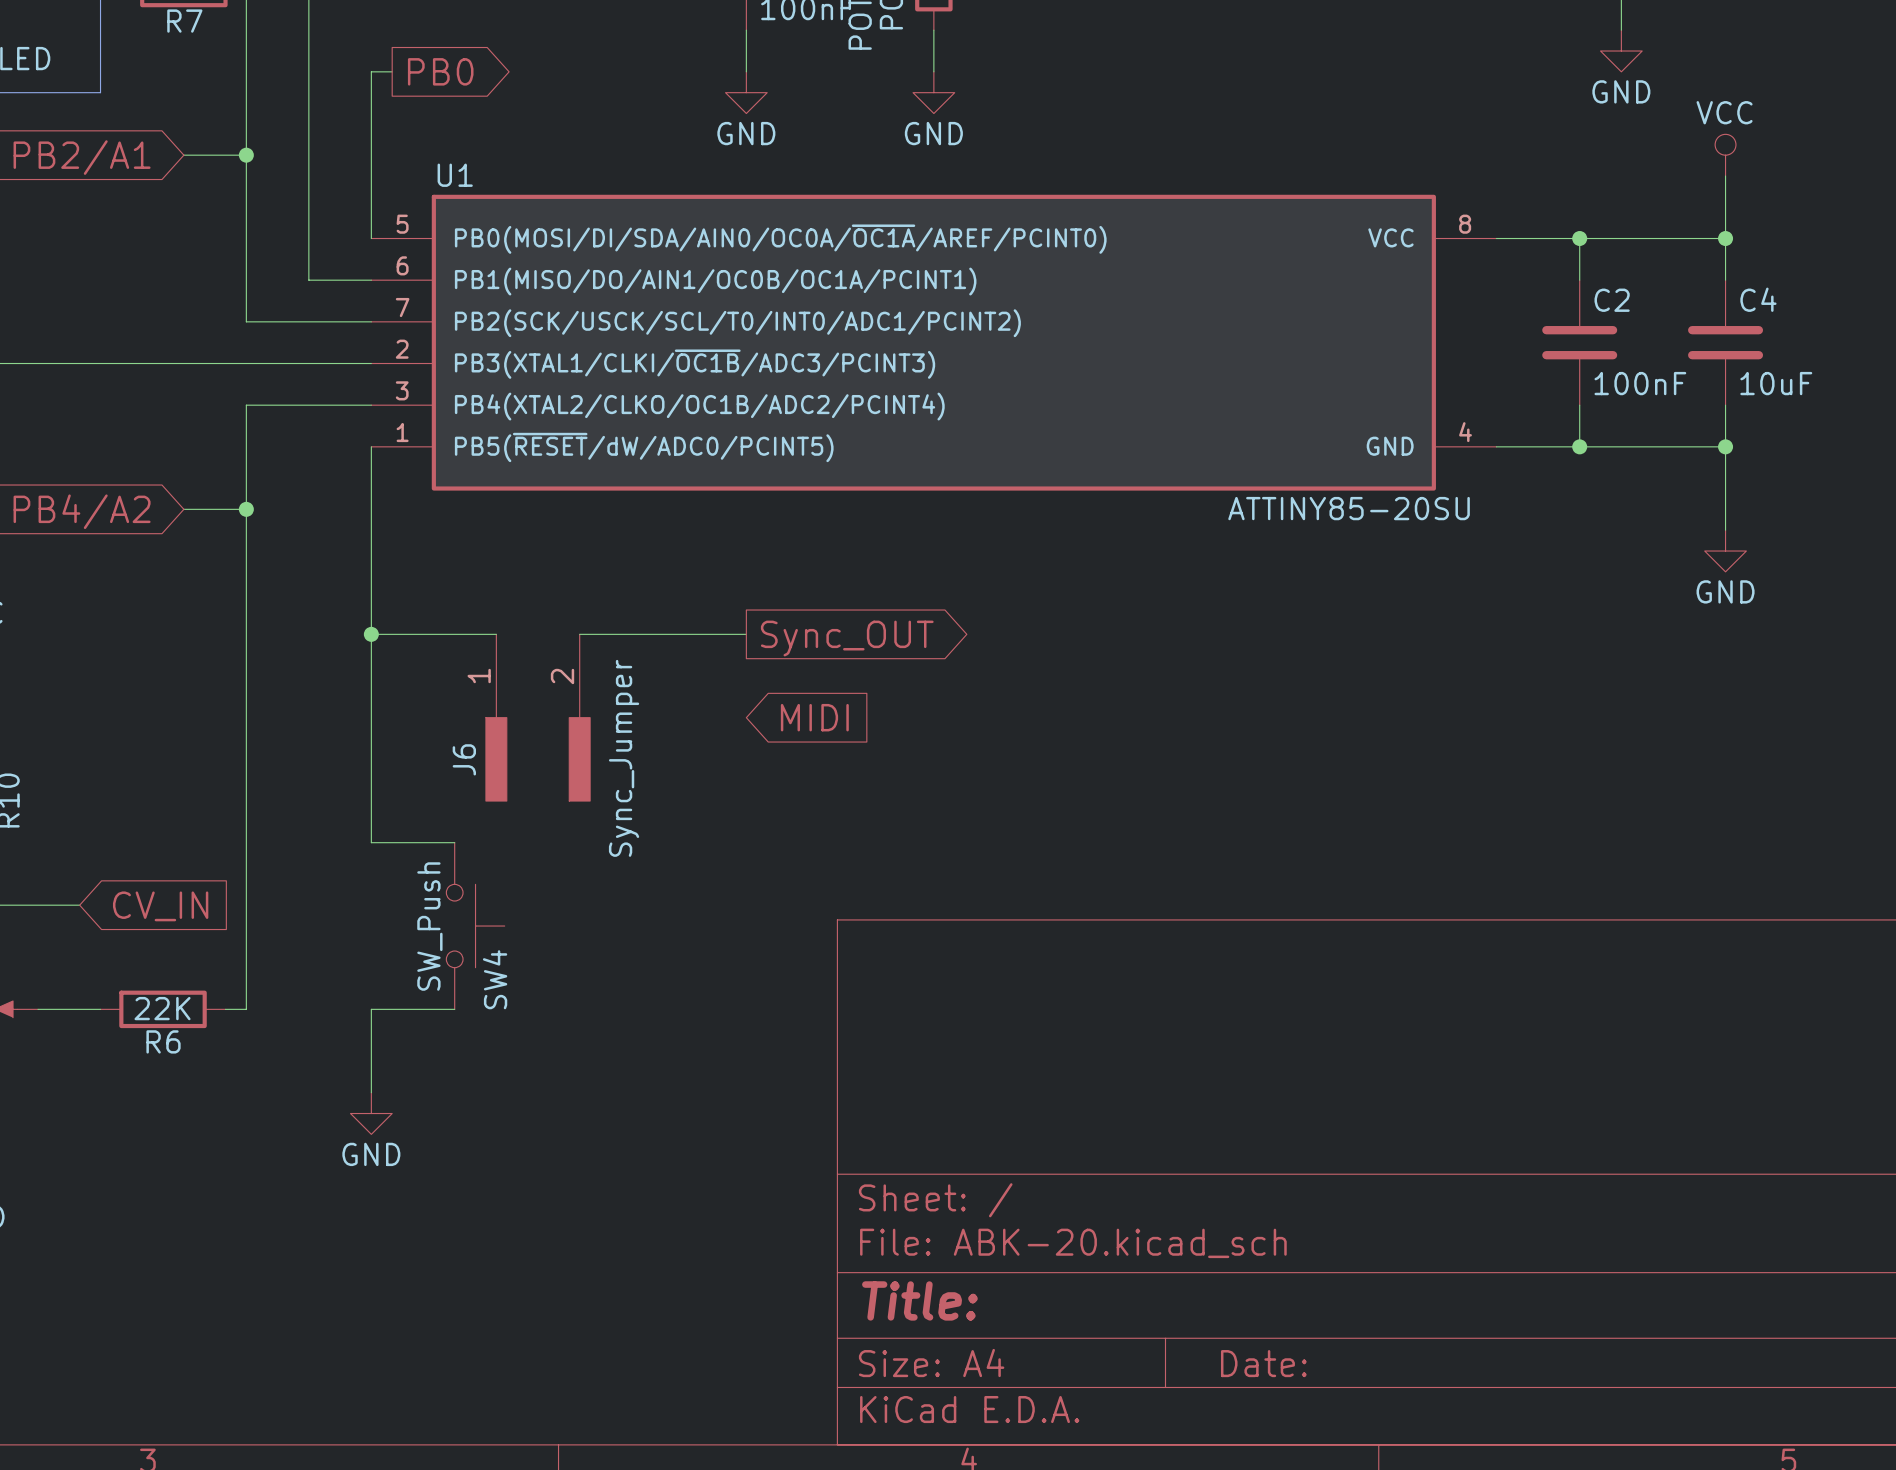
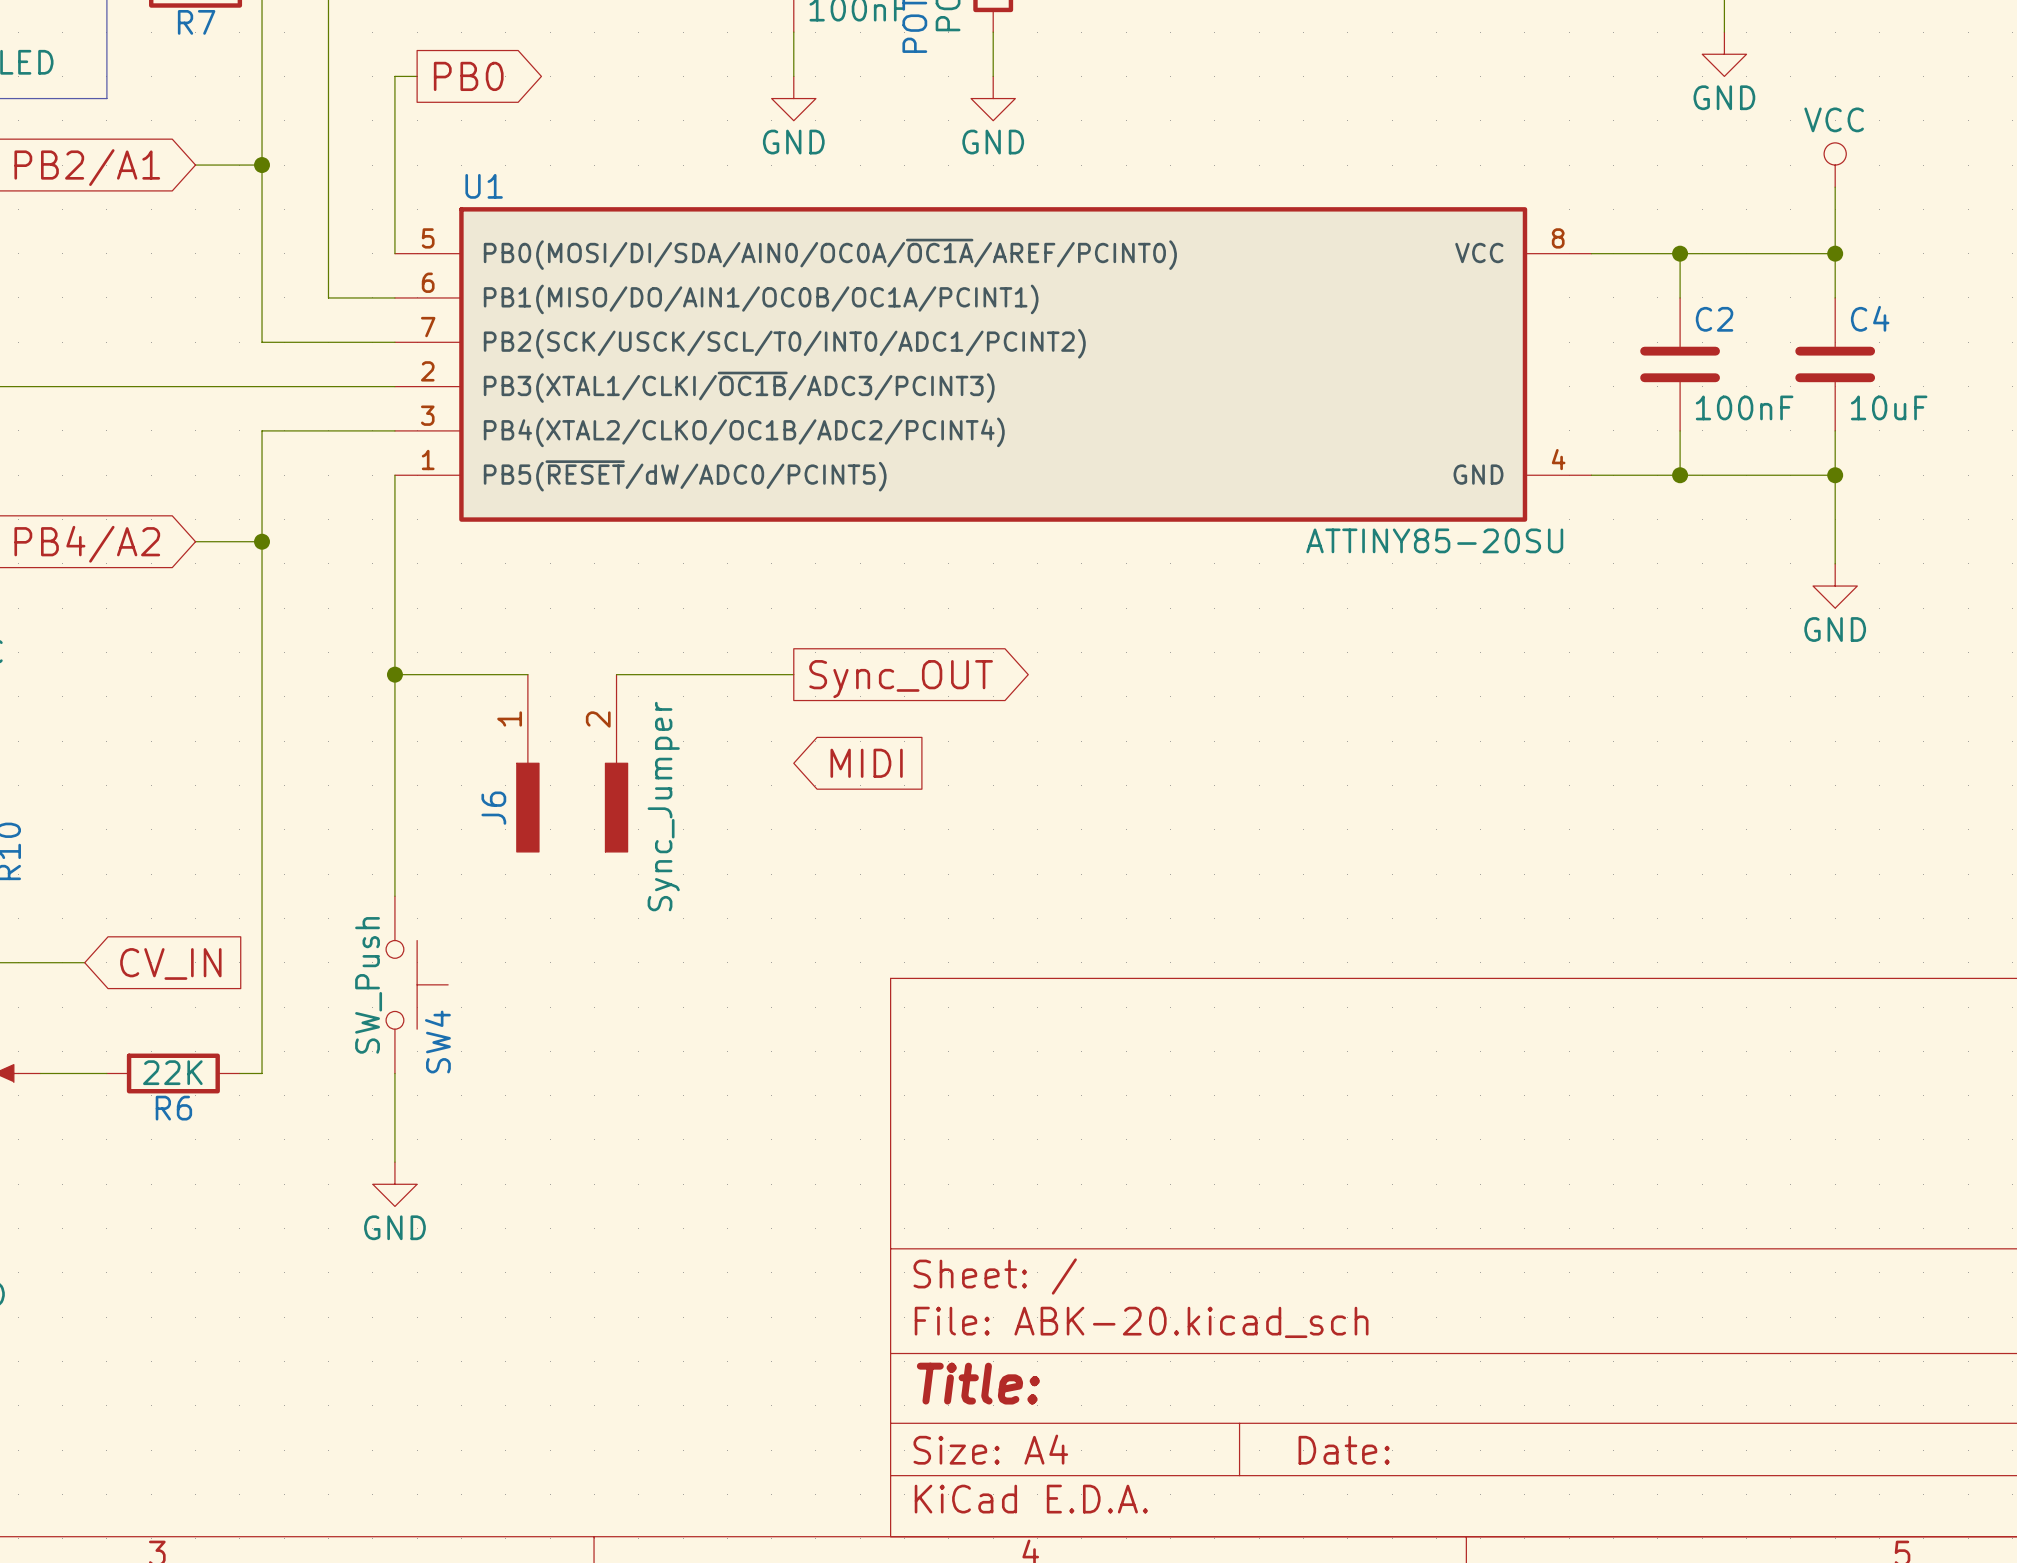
wire: (371, 842) (454, 842) -> none
SW4 position: (475, 926) -> (417, 984)
wire: (371, 1009) (454, 1009) -> none

